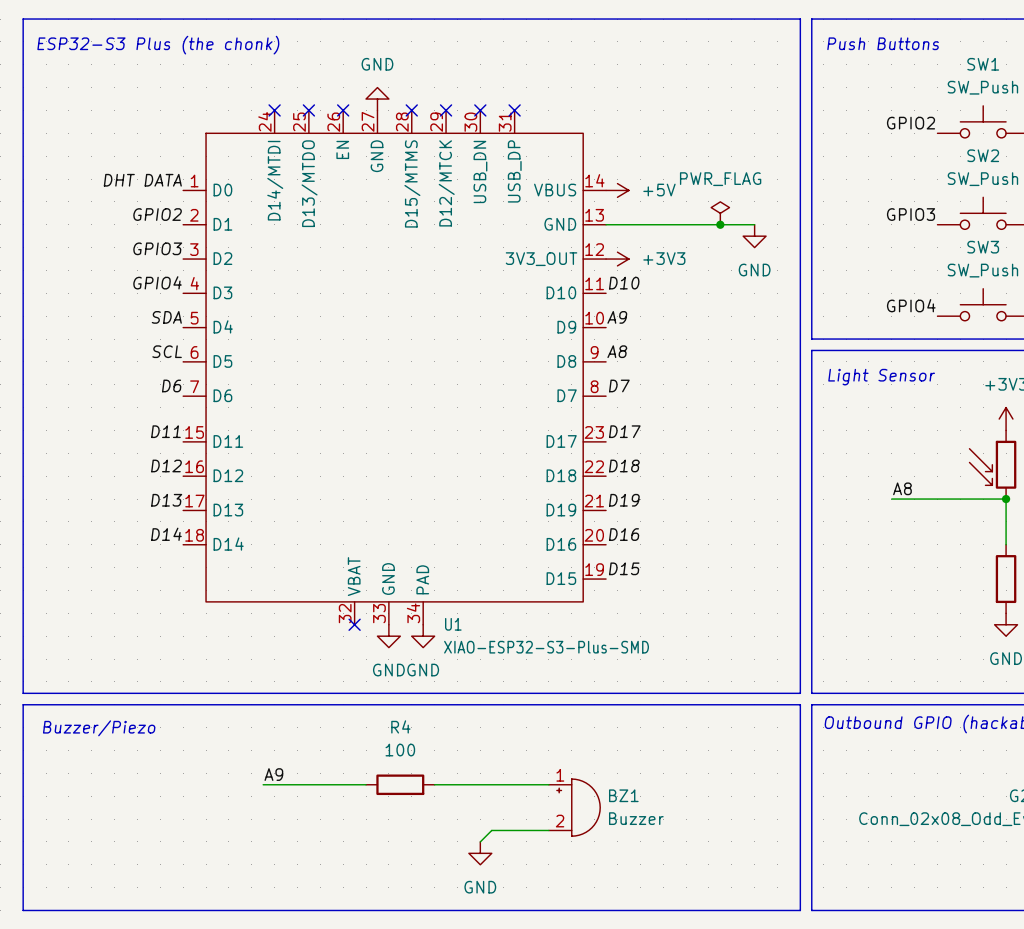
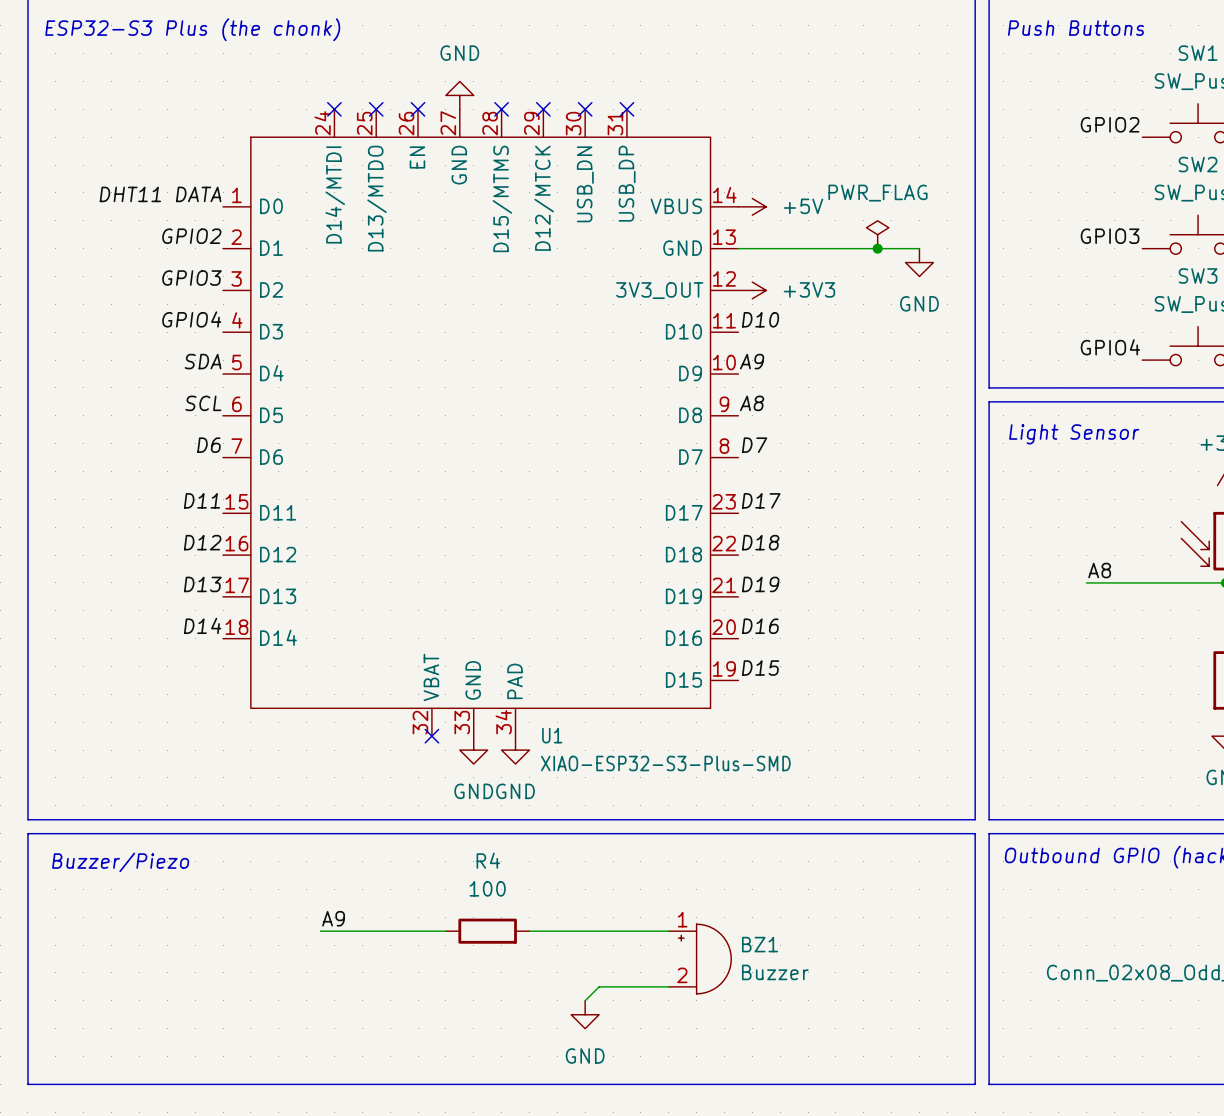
label: DHT DATA (142, 180) -> DHT11 DATA (160, 194)

